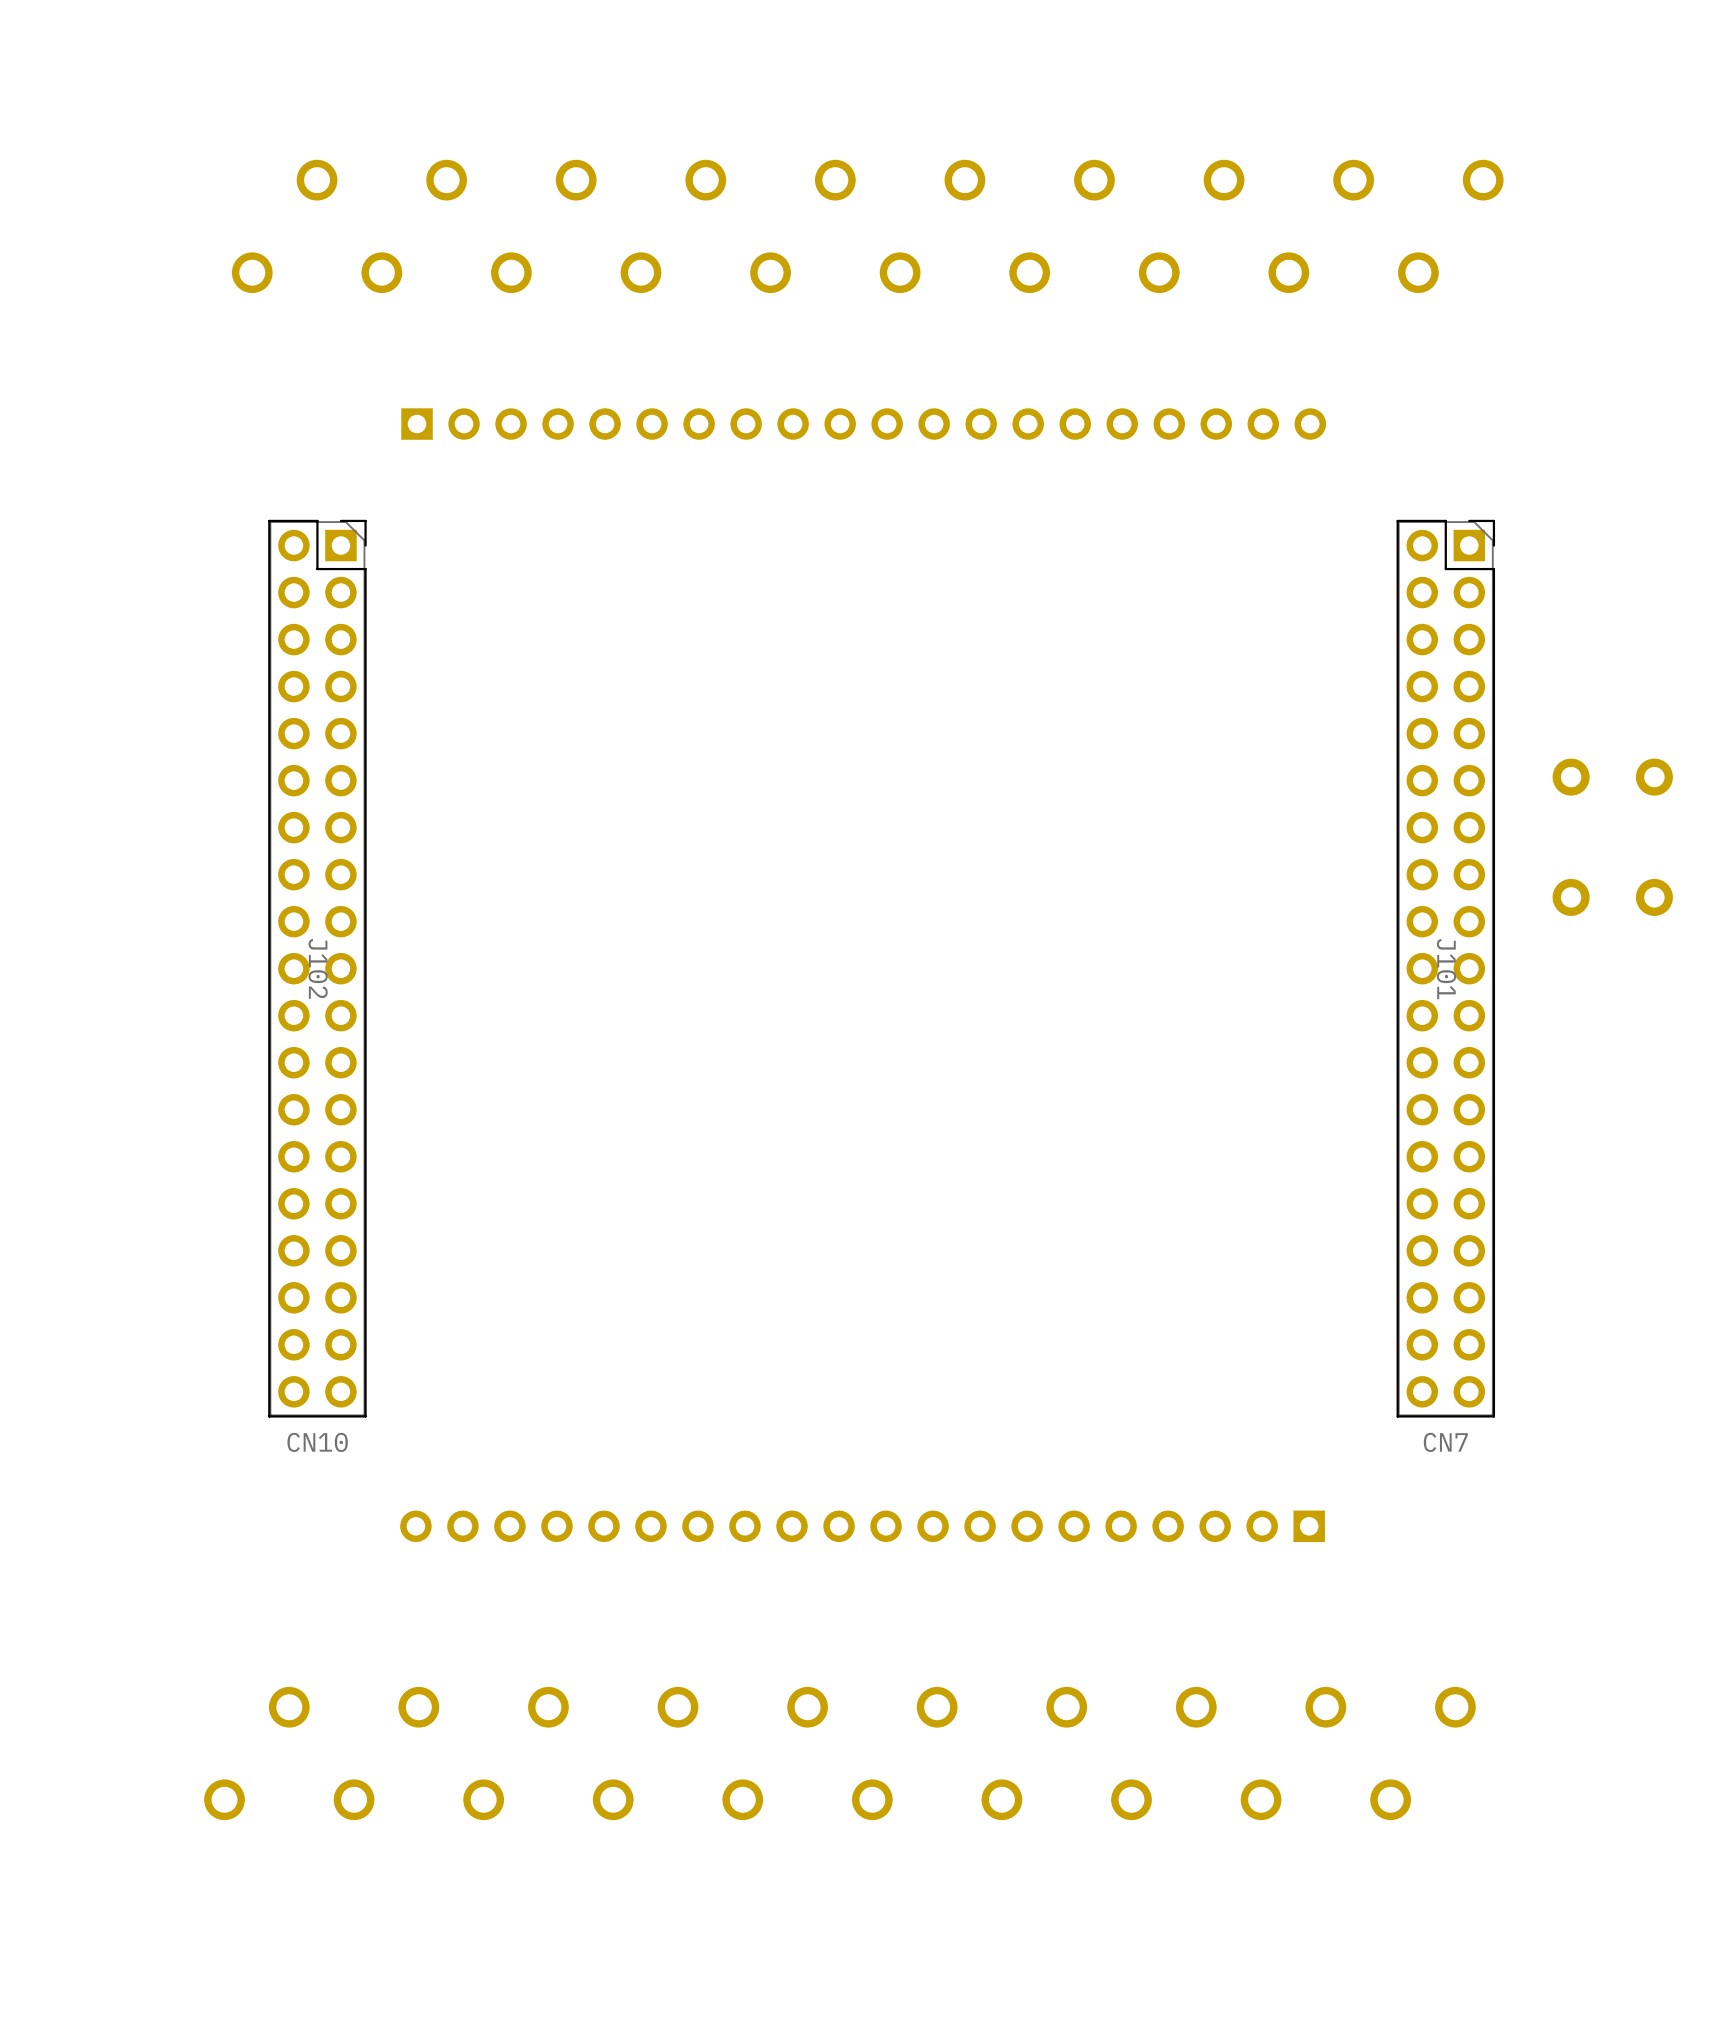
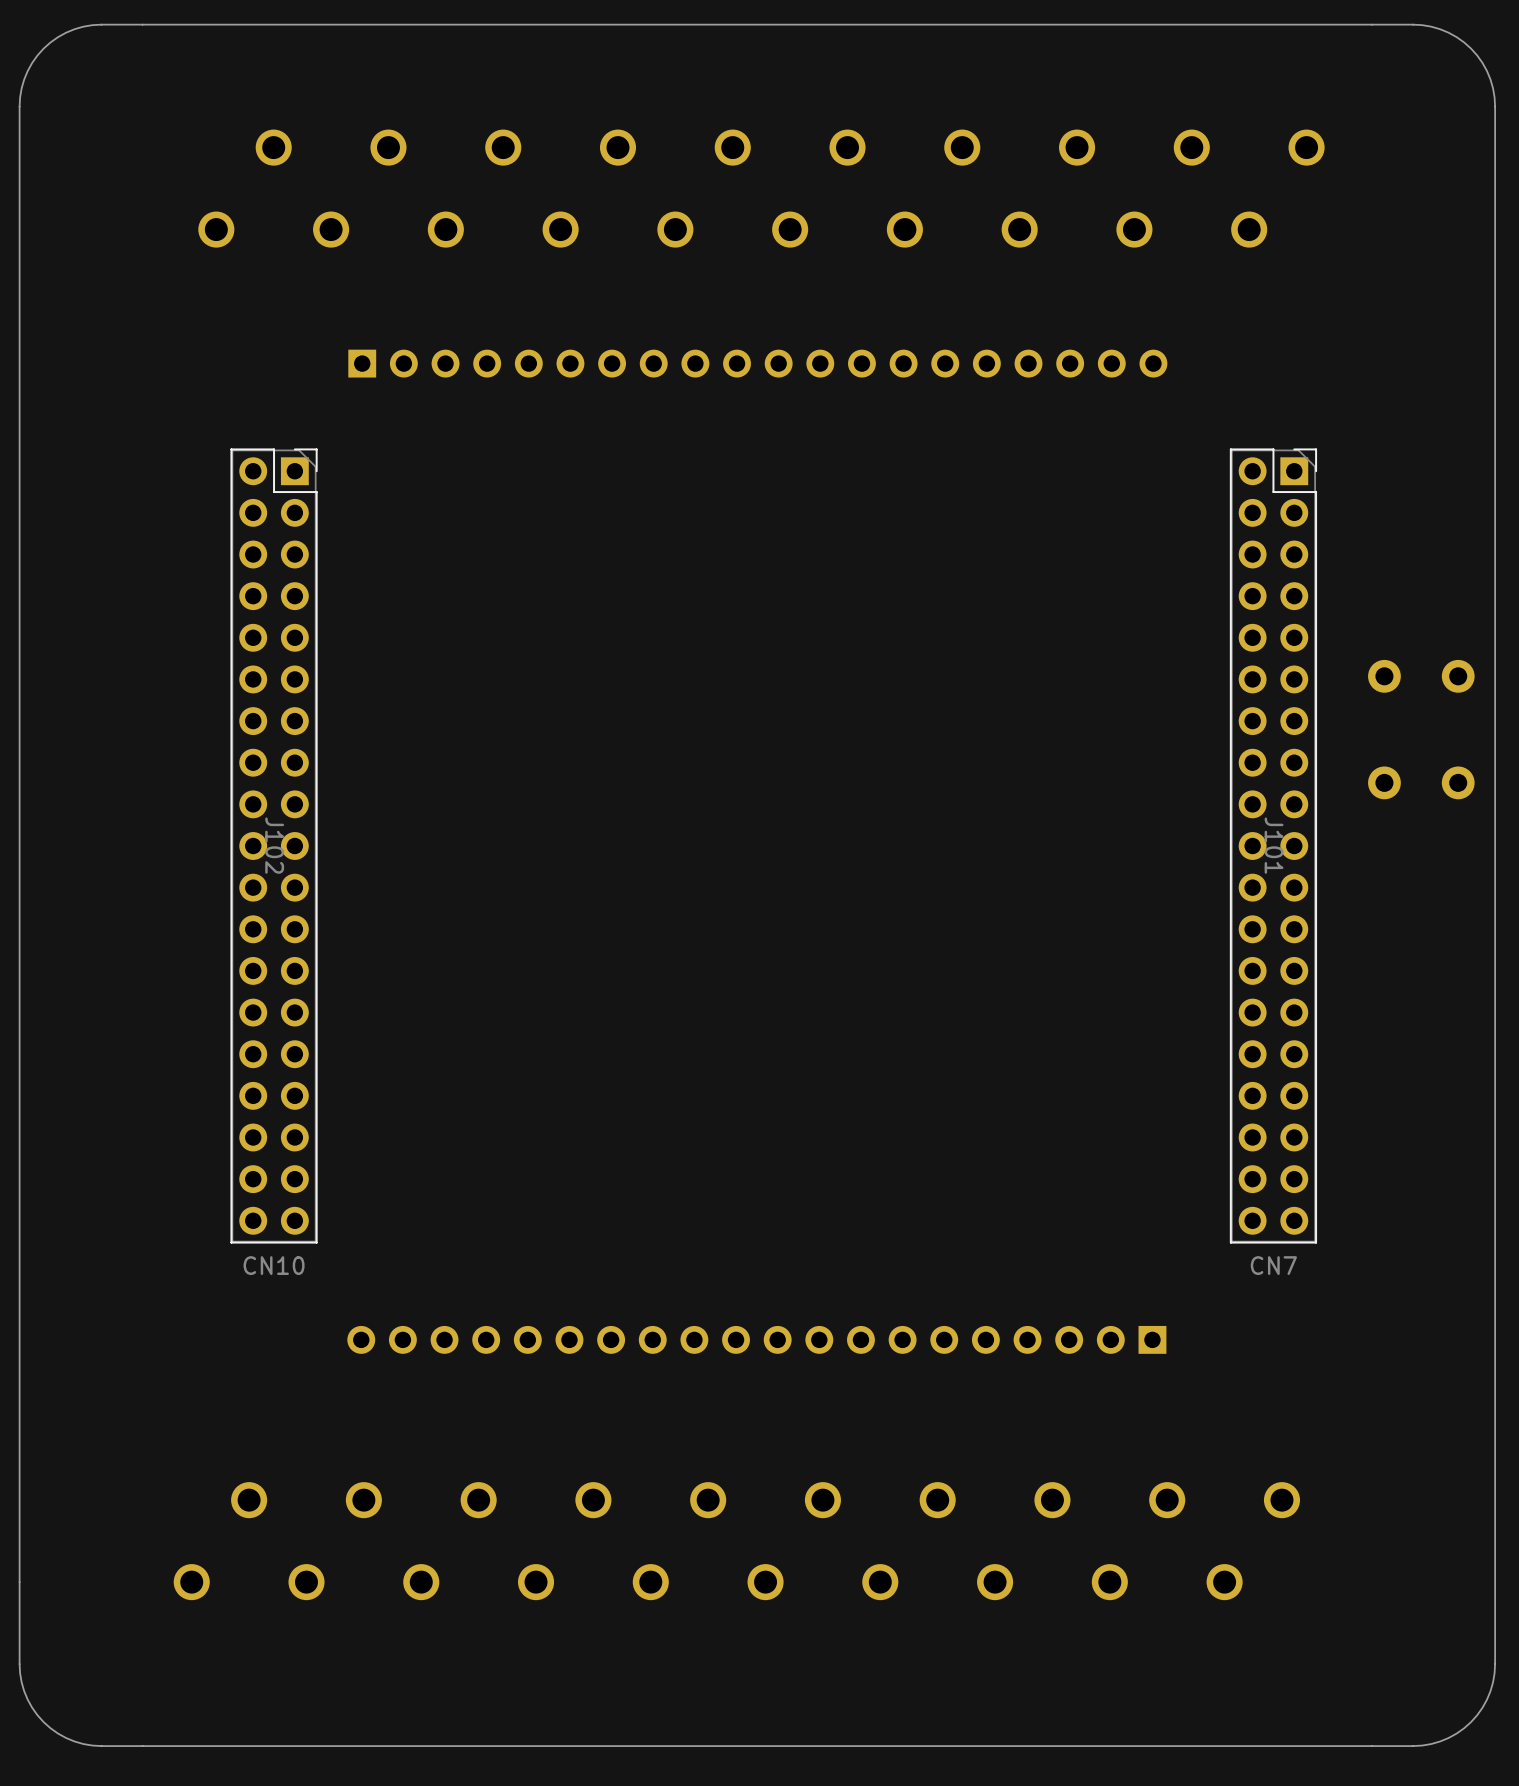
board edge: none -> (1413, 24) (101, 24) (83, 26) (66, 32) (50, 42) (37, 55) (24, 79) (19, 106) (19, 1664) (21, 1682) (27, 1699) (37, 1715) (50, 1728) (74, 1741) (101, 1746) (1413, 1746) (1431, 1744) (1448, 1737) (1464, 1728) (1477, 1715) (1490, 1691) (1495, 1664) (1495, 106) (1493, 88) (1486, 71) (1471, 48) (1456, 37) (1440, 29) (1413, 24)

